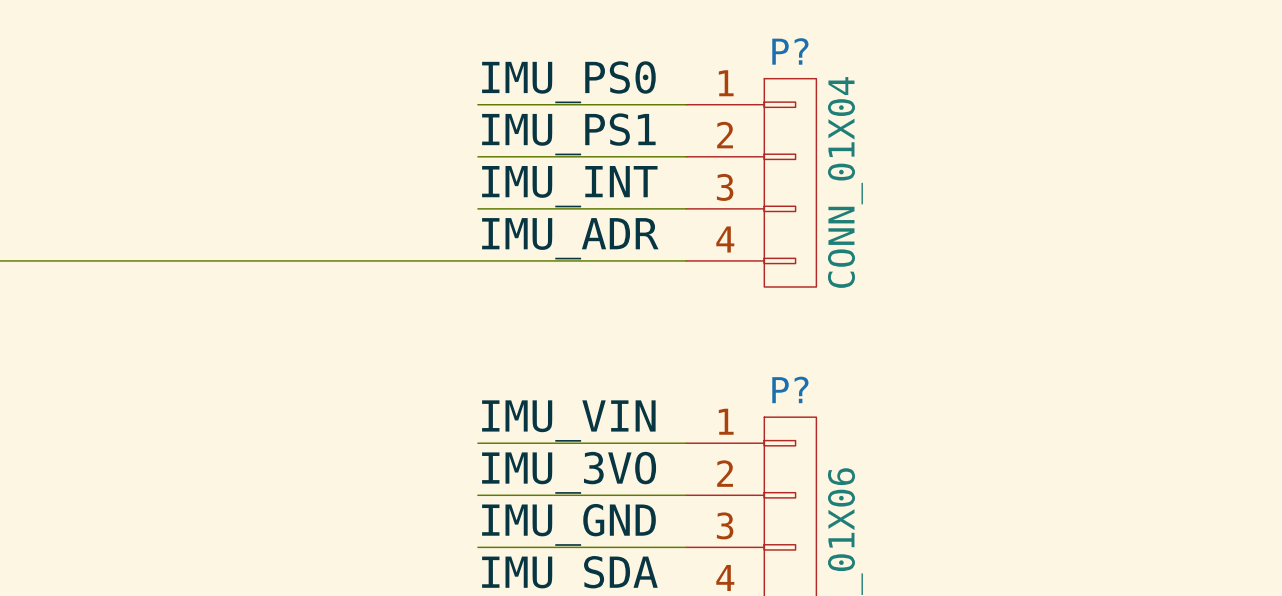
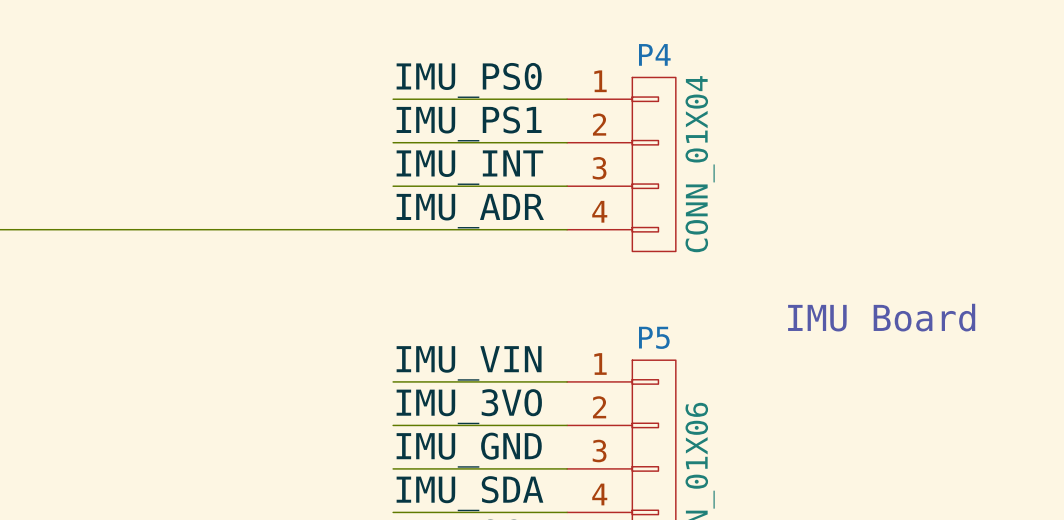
P? name: P? (790, 51) -> P4 (654, 54)
text: none -> IMU Board (881, 317)
P? name: P? (790, 389) -> P5 (654, 337)

